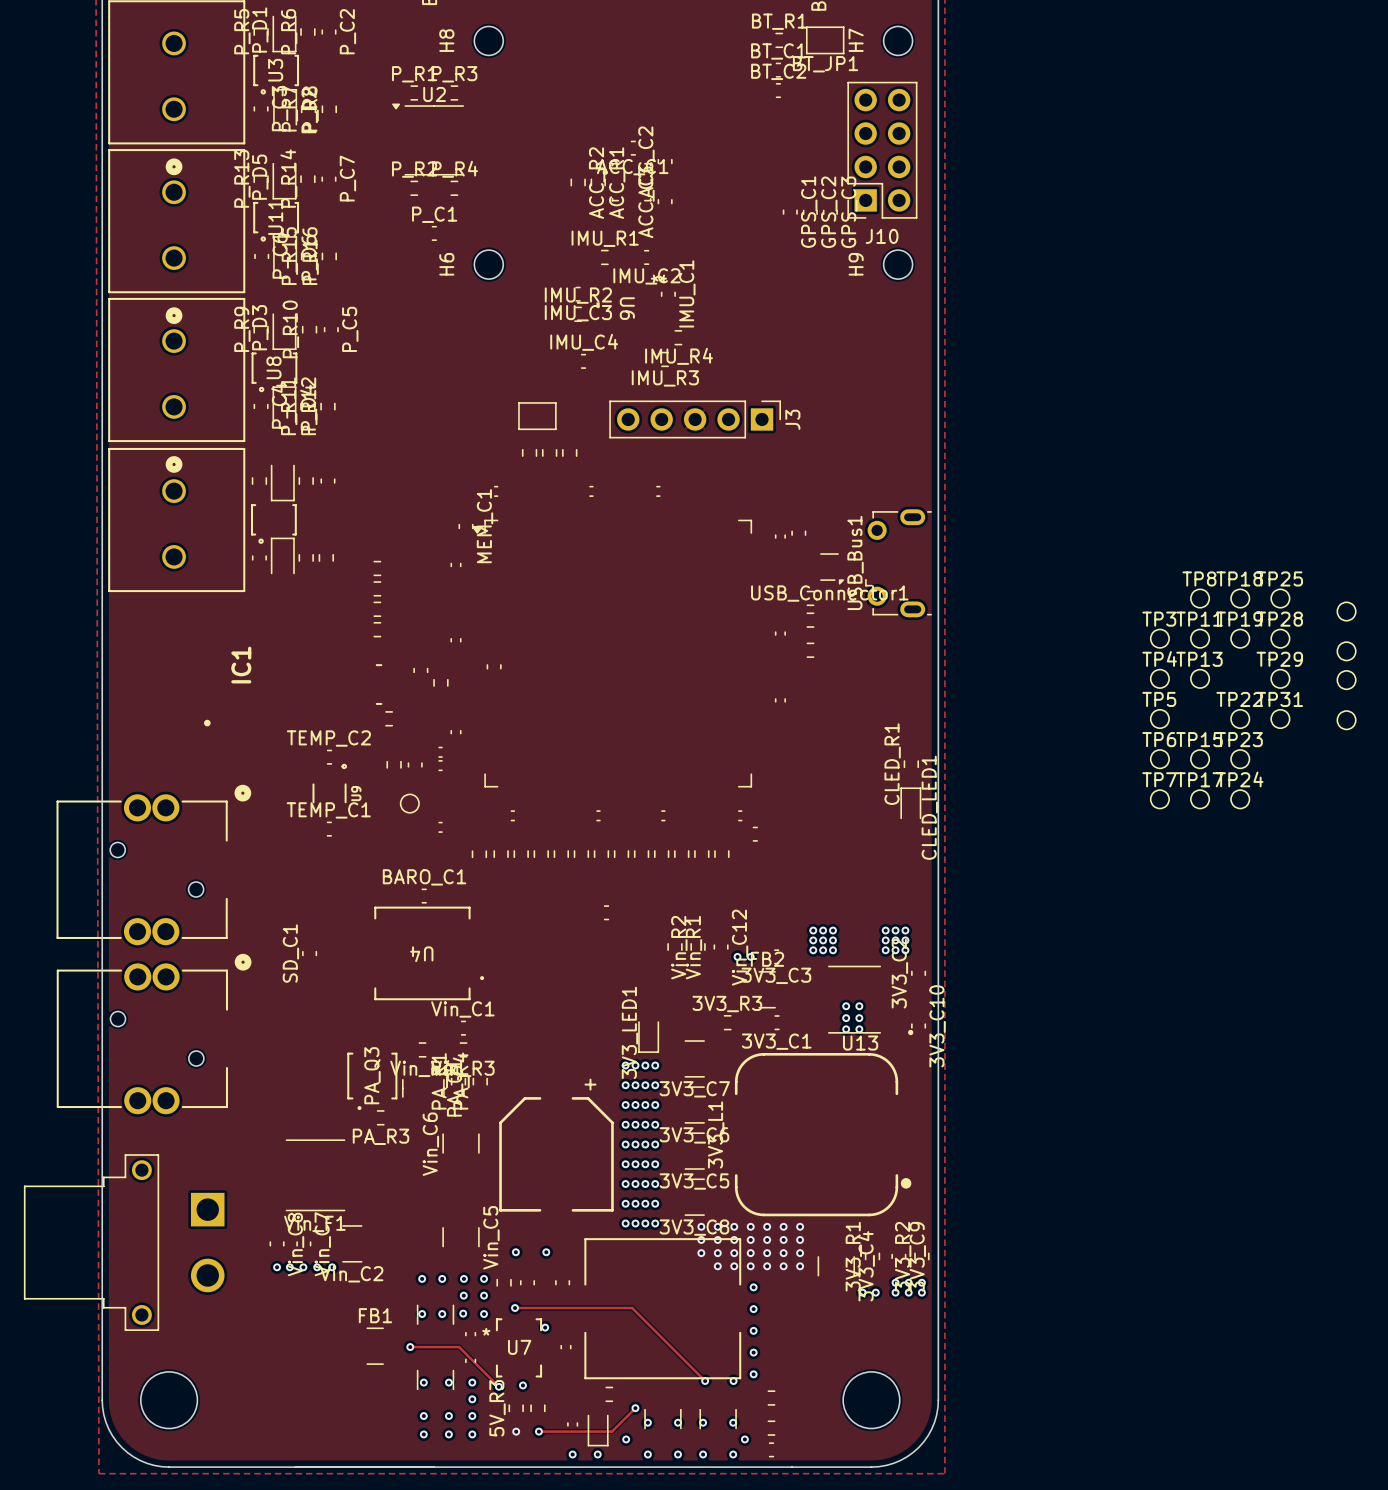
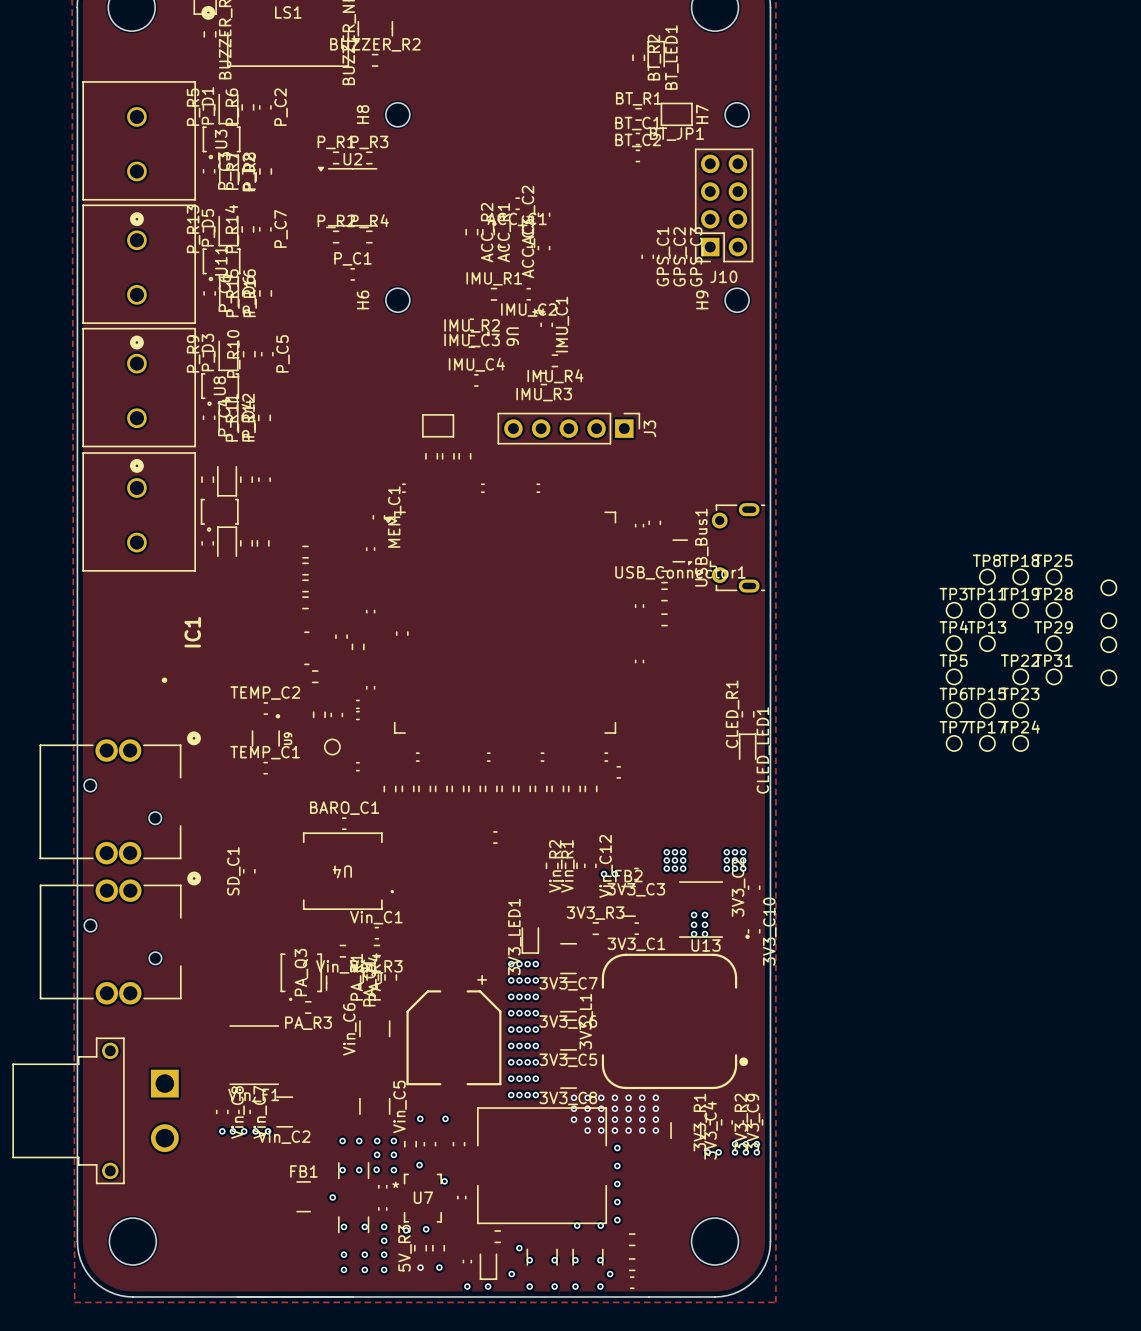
track: (515, 1308) (632, 1308) (705, 1381) -> none
track: (410, 1347) (459, 1347) (498, 1386) -> none
track: (635, 1408) (612, 1431) (538, 1431) -> none

